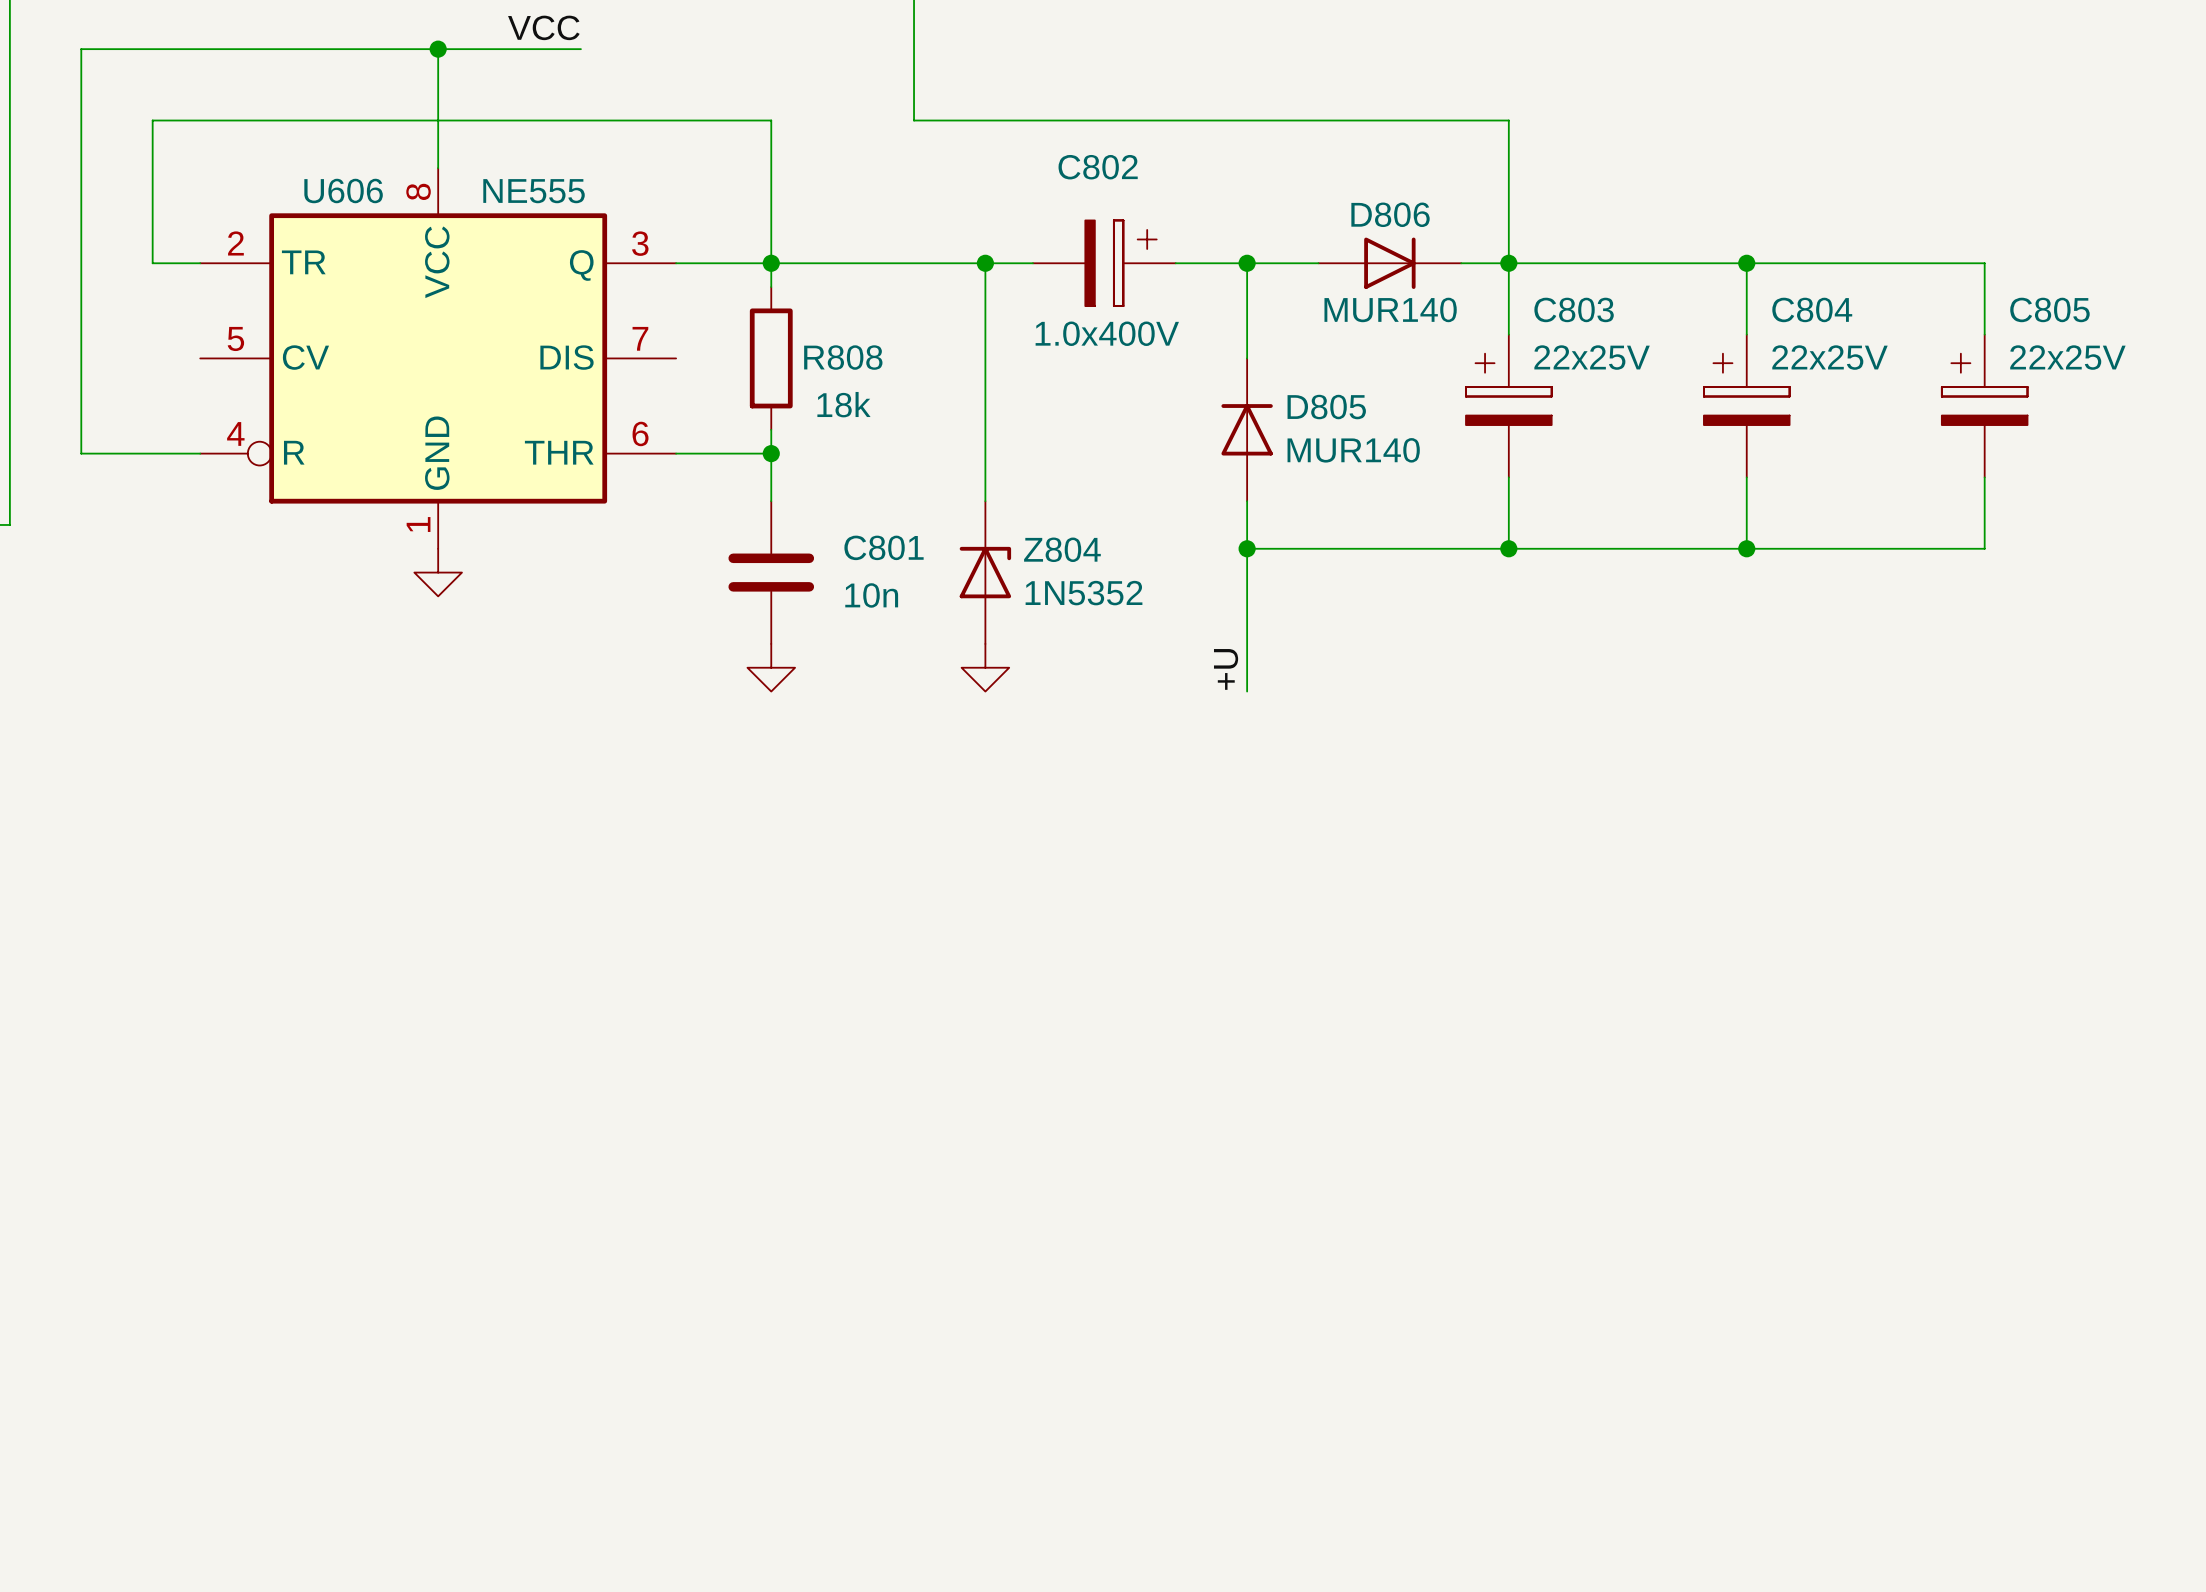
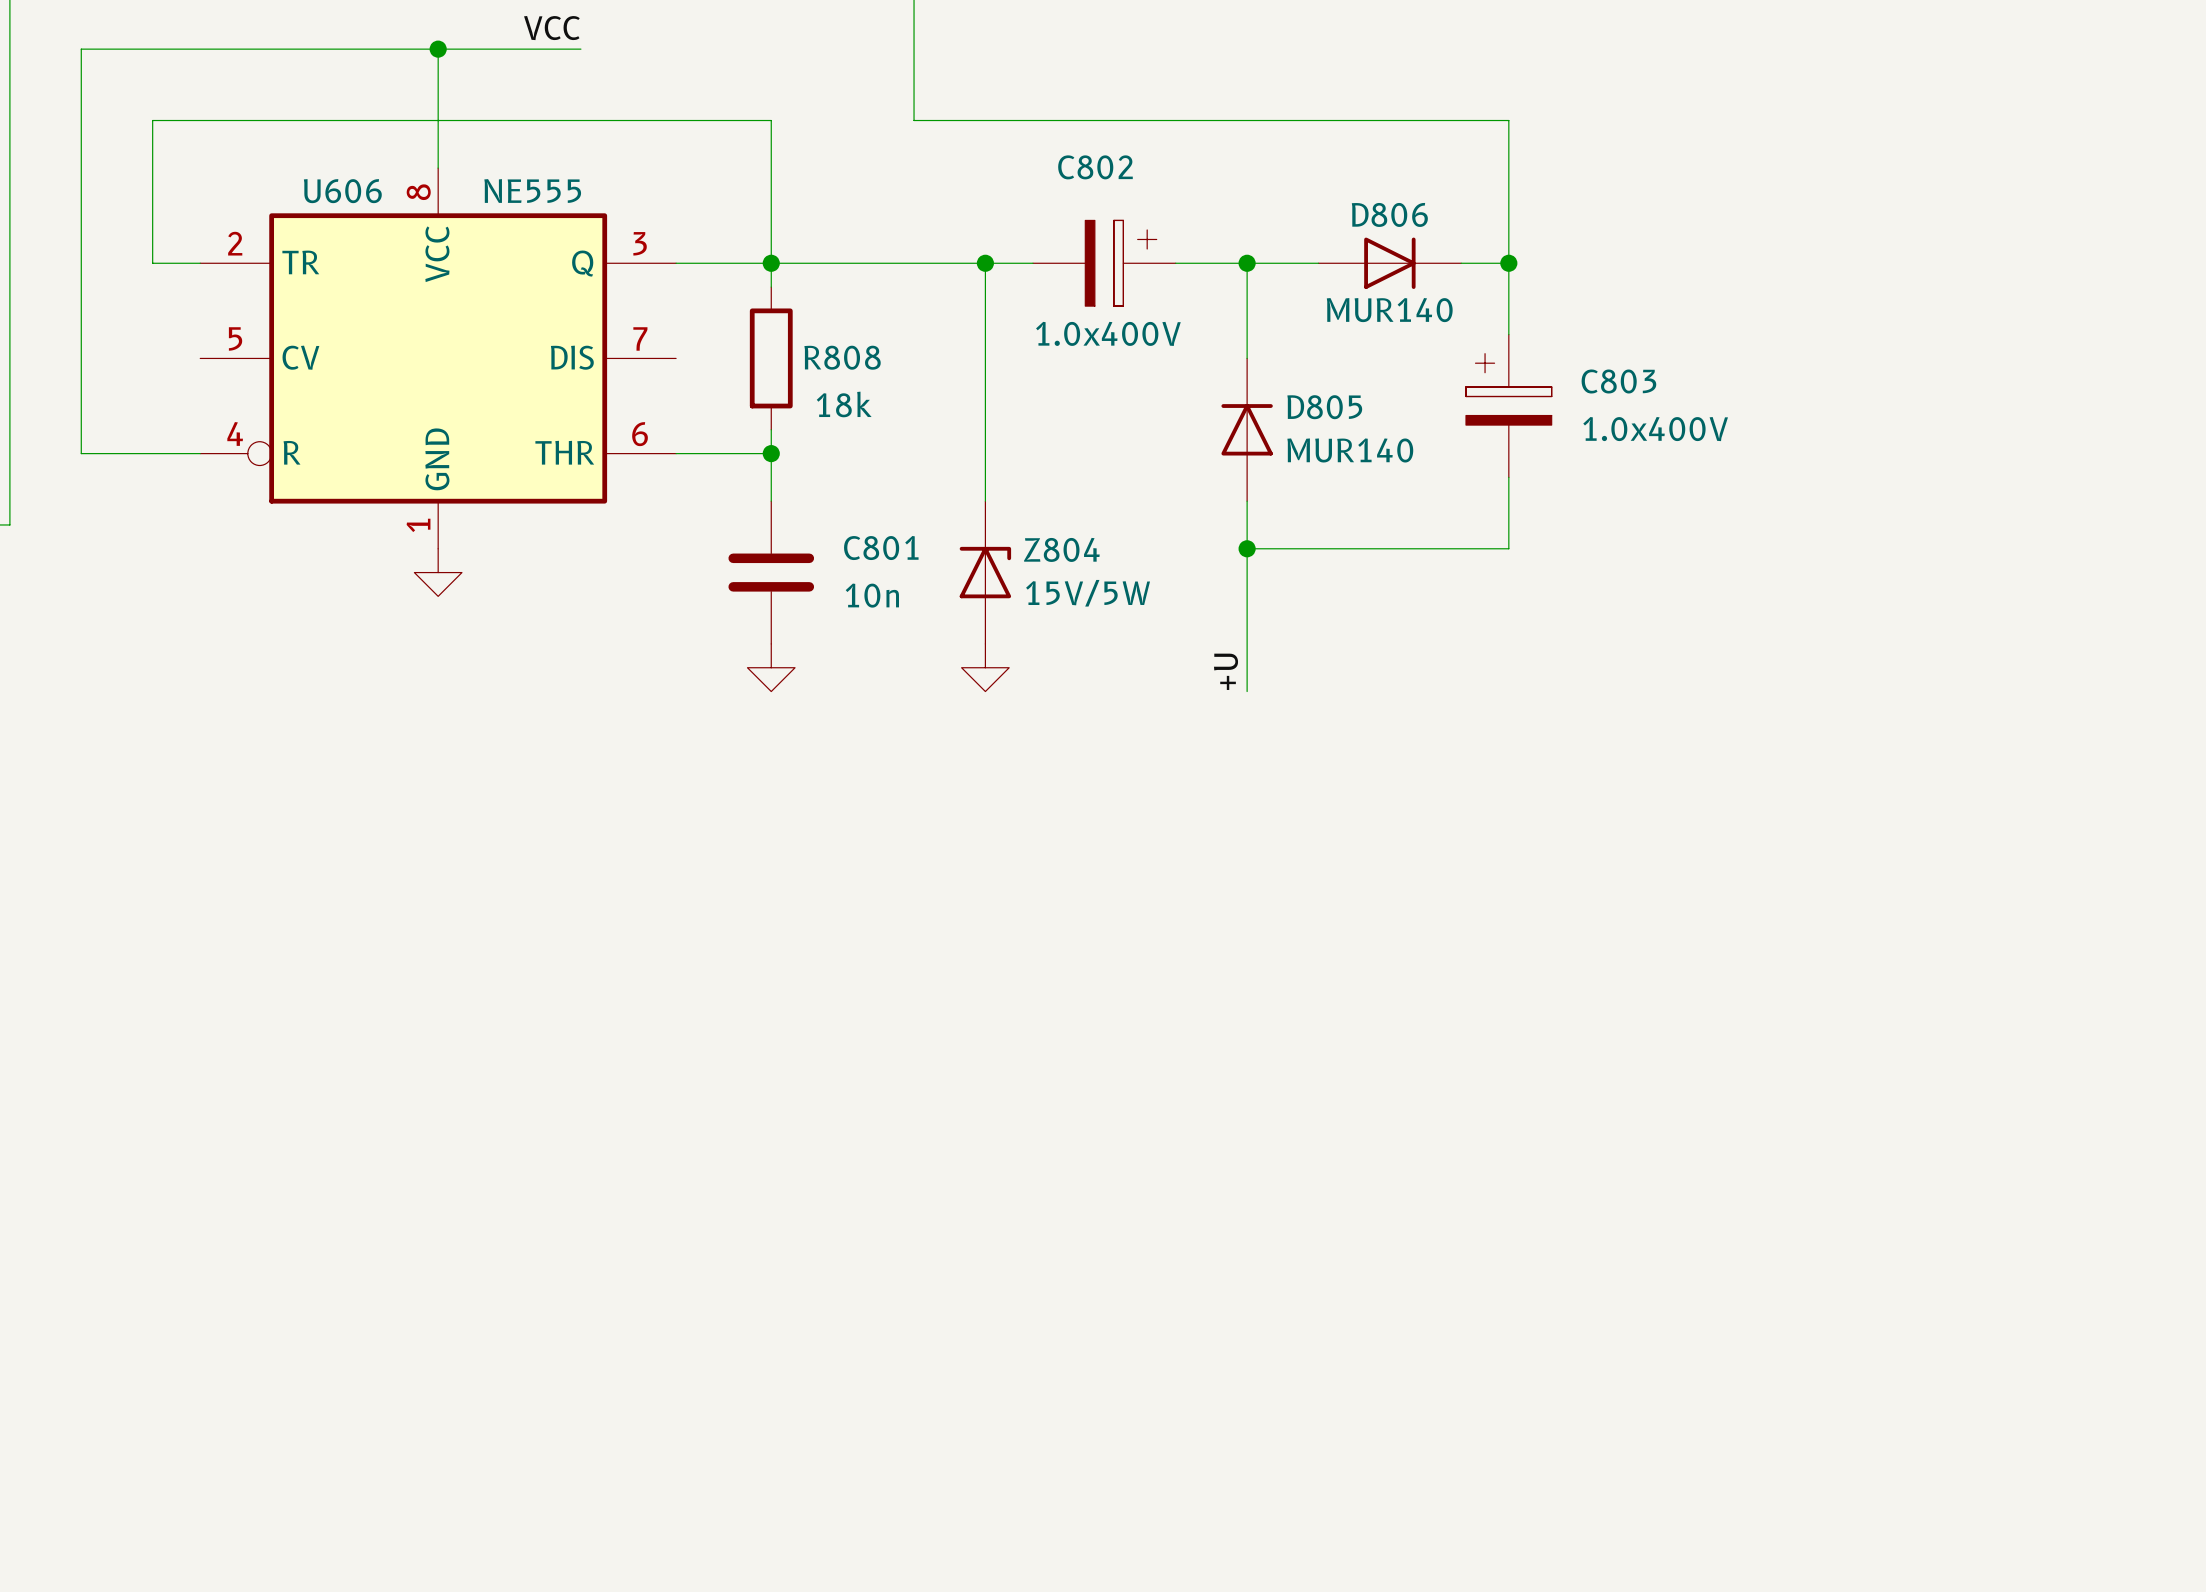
wire: (1508, 263) (1984, 263) (1984, 334) -> none
wire: (1746, 263) (1746, 334) -> none
junction: (1746, 263) -> none
C803 name position: C803 (1574, 309) -> C803 (1618, 381)
C803 value: 22x25V (1592, 357) -> 1.0x400V (1655, 429)
C804: 22x25V (1746, 406) -> none
C805: 22x25V (1984, 406) -> none
wire: (1746, 477) (1746, 548) -> none
wire: (1984, 477) (1984, 548) (1508, 548) -> none
junction: (1508, 548) -> none
junction: (1746, 548) -> none
Z804 value: 1N5352 (1084, 593) -> 15V/5W (1088, 593)

